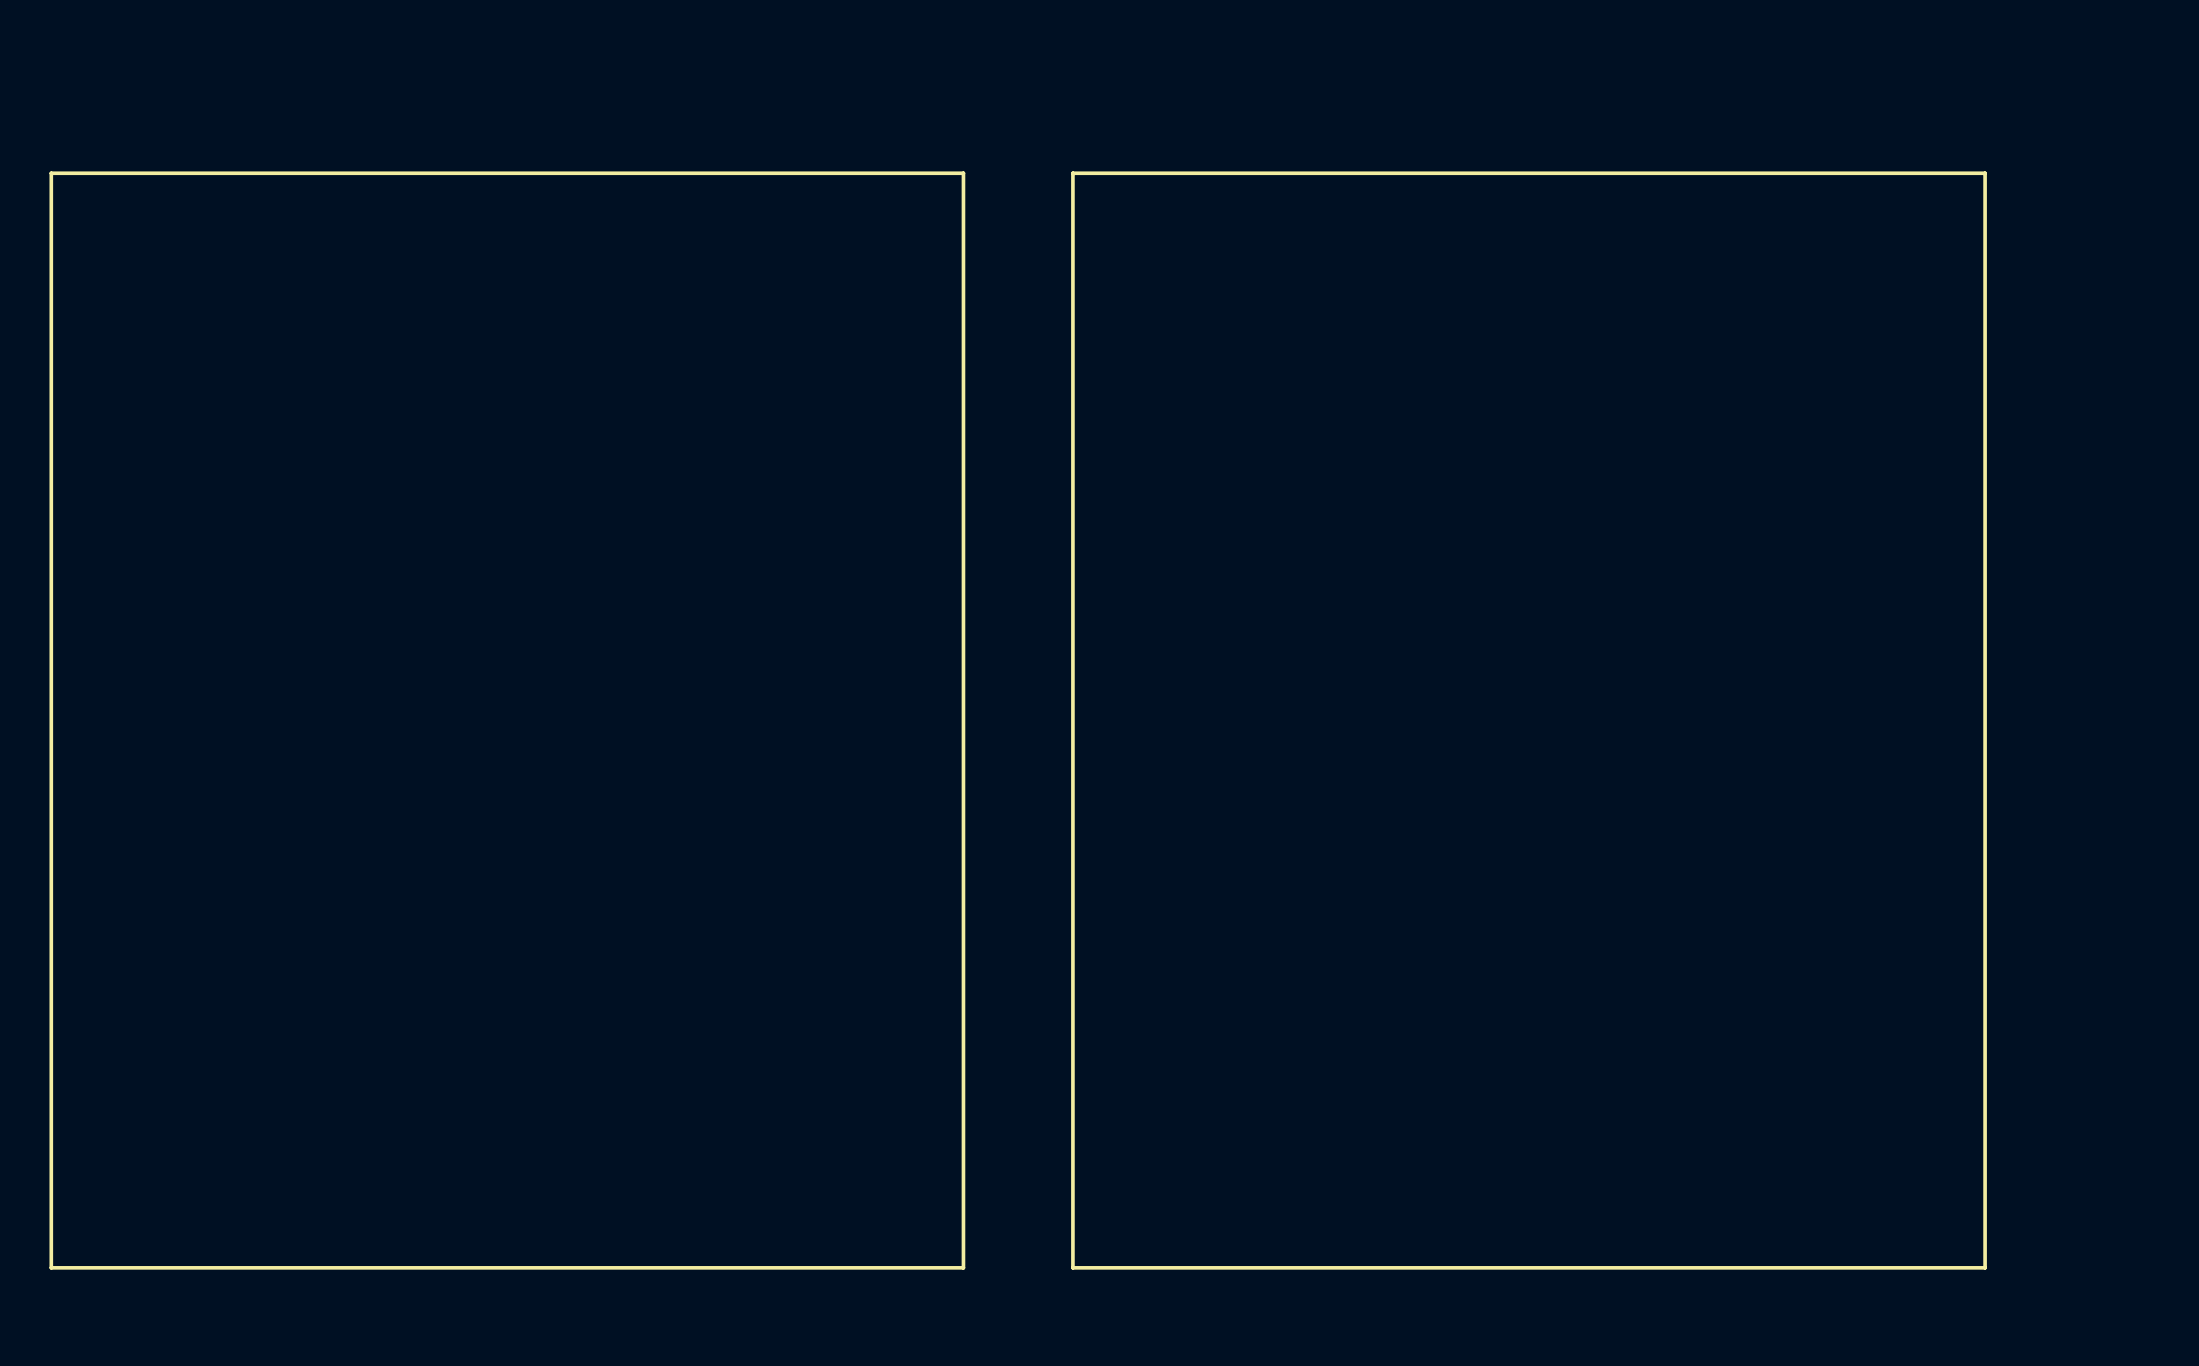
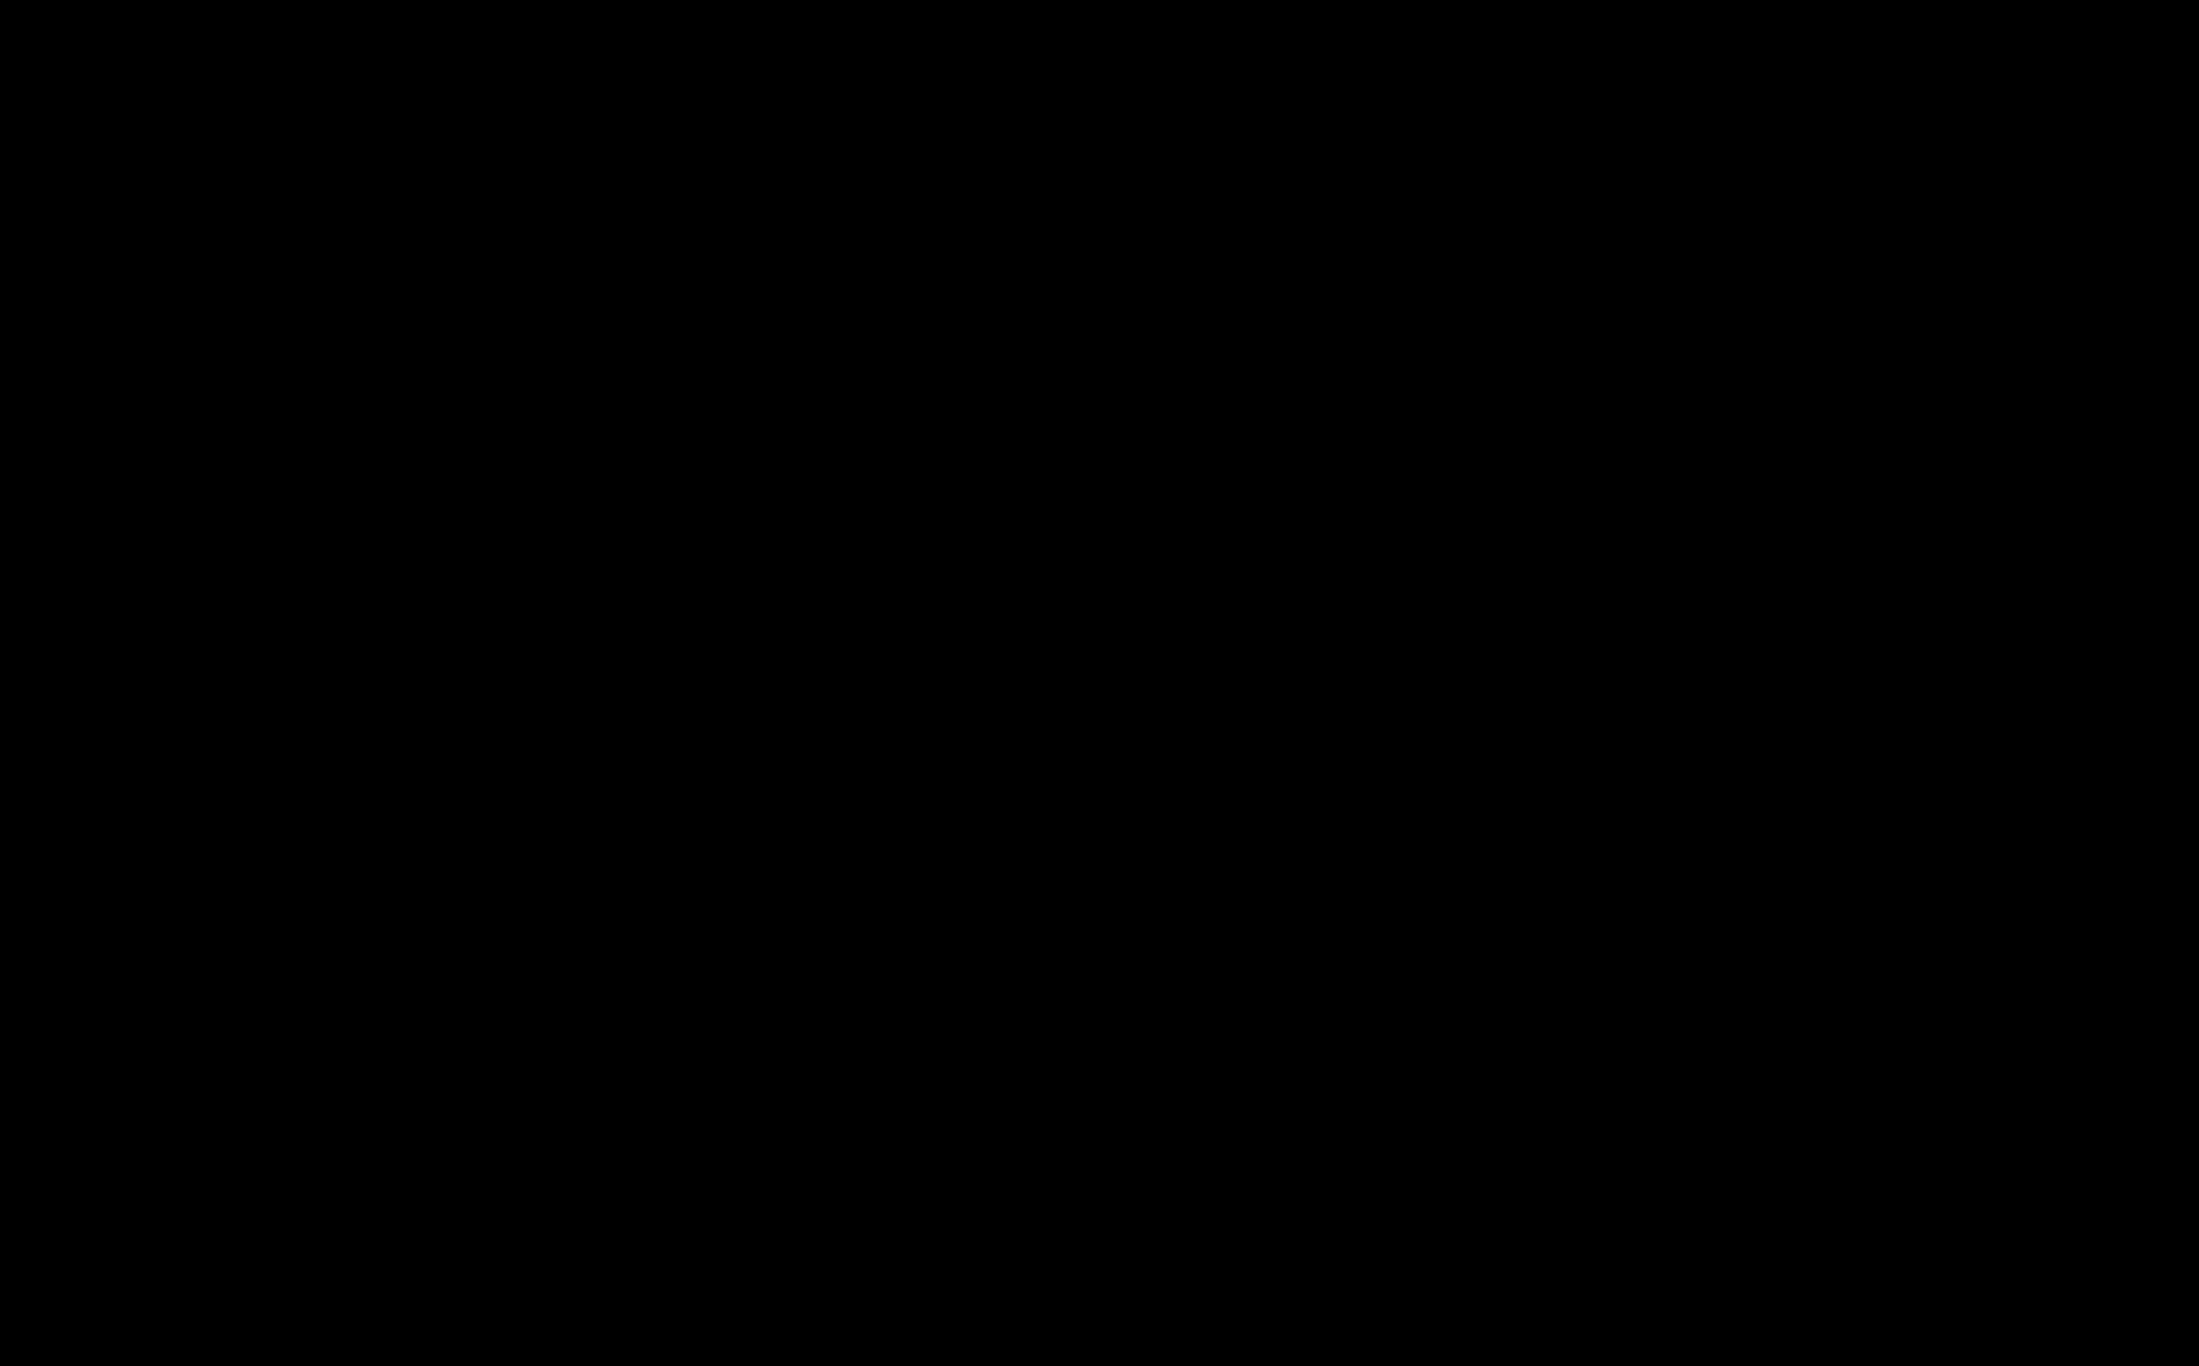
line: (51, 173) (963, 173) (963, 1267) (51, 1267) (51, 173) -> none
line: (1072, 173) (1985, 173) (1985, 1267) (1072, 1267) (1072, 173) -> none

